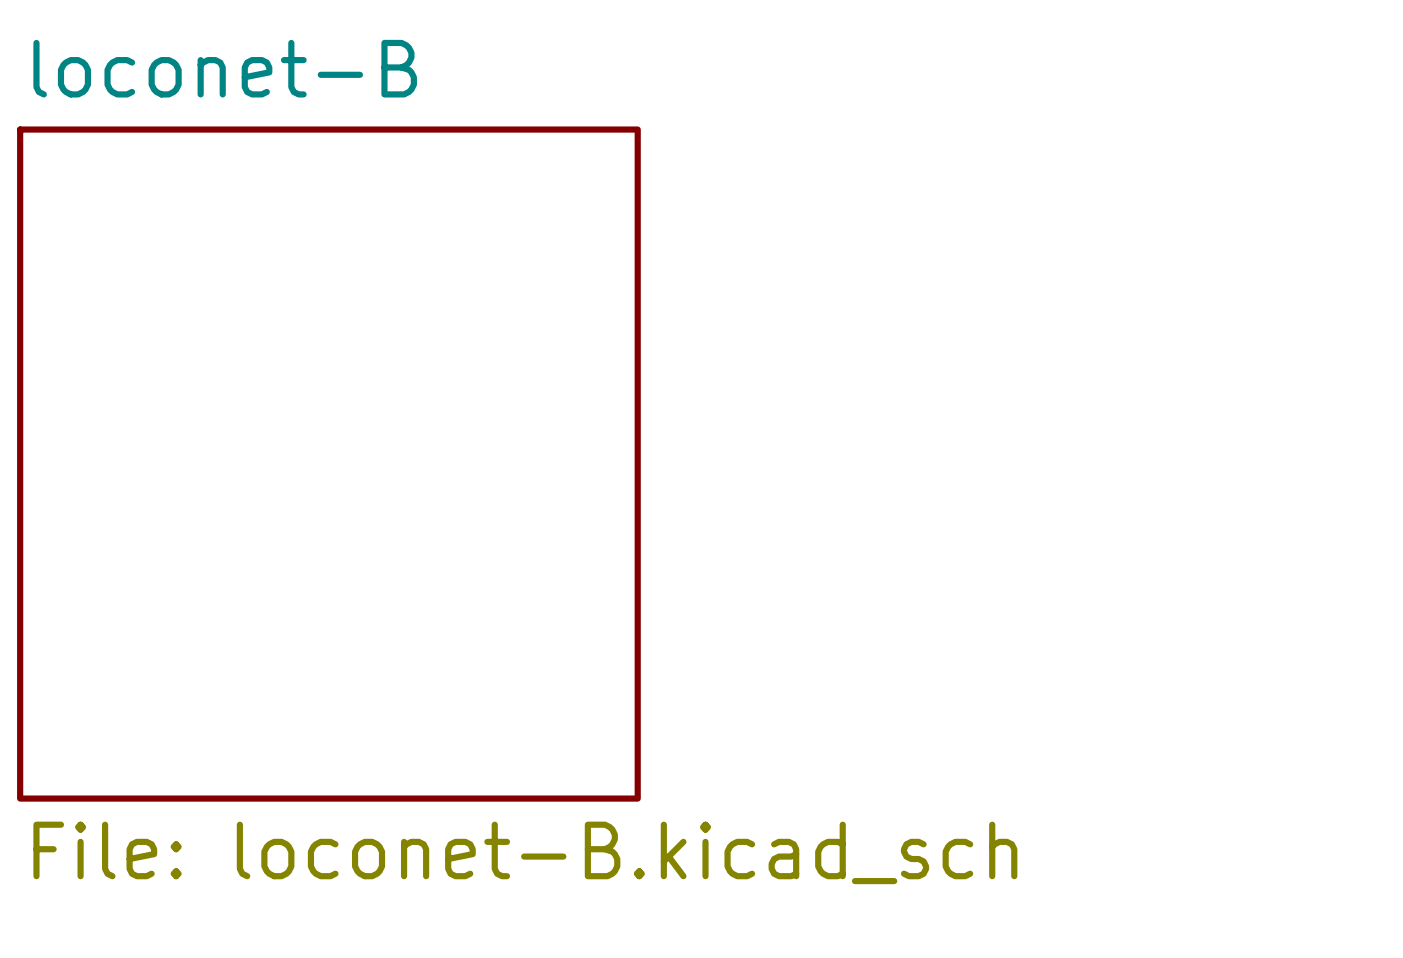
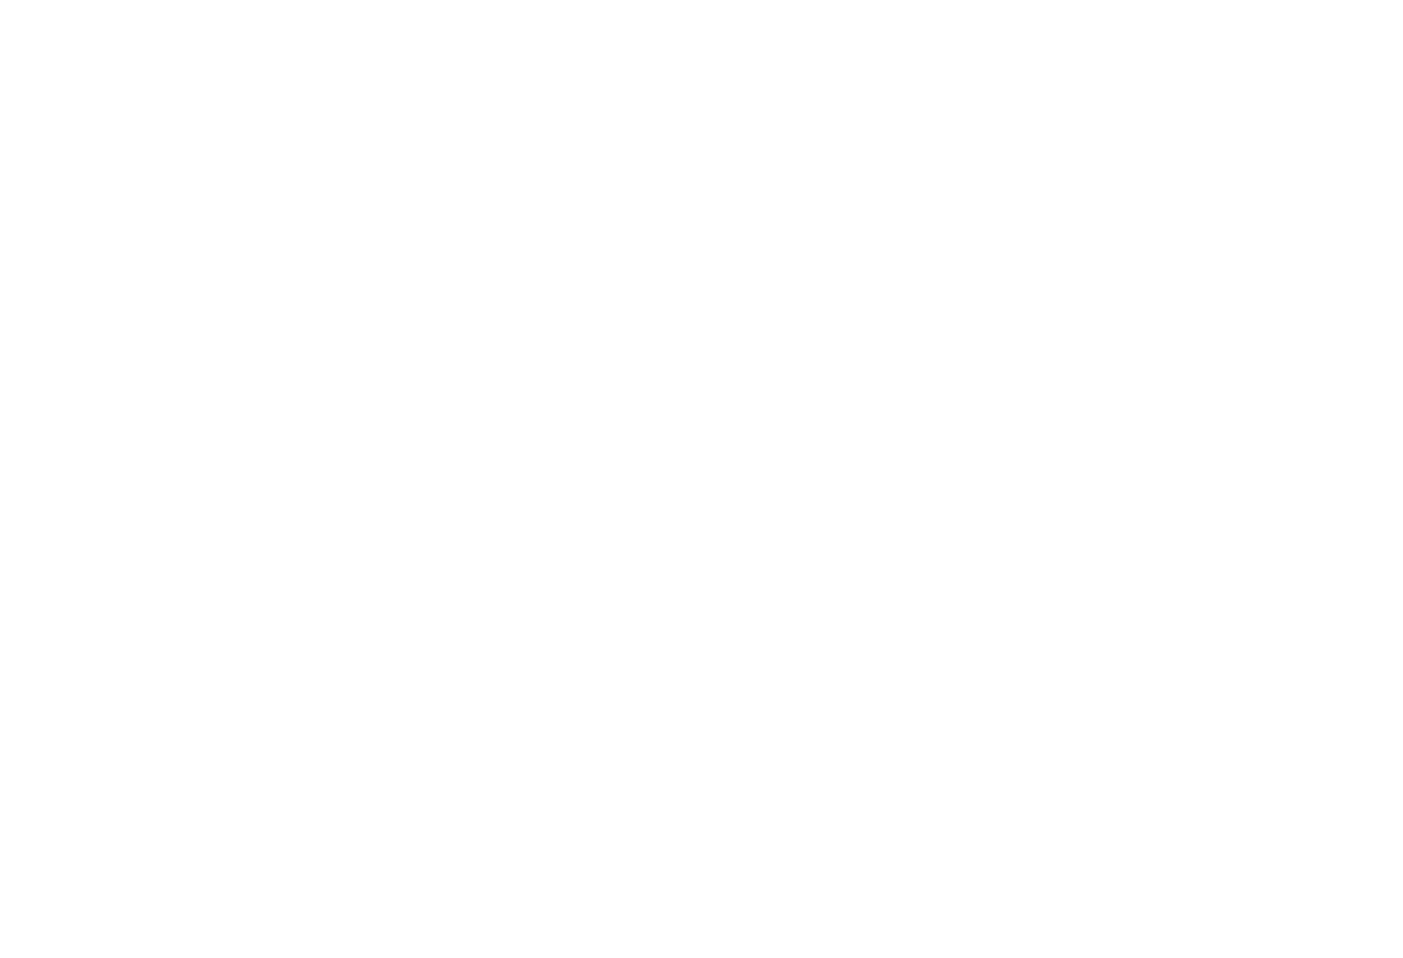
sheet loconet-B: File: loconet-B.kicad_sch (328, 464) -> none

